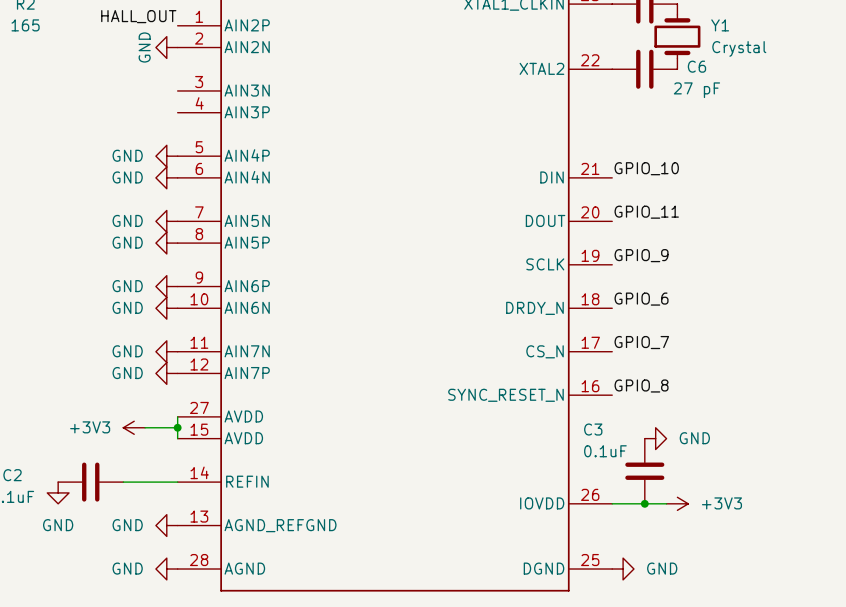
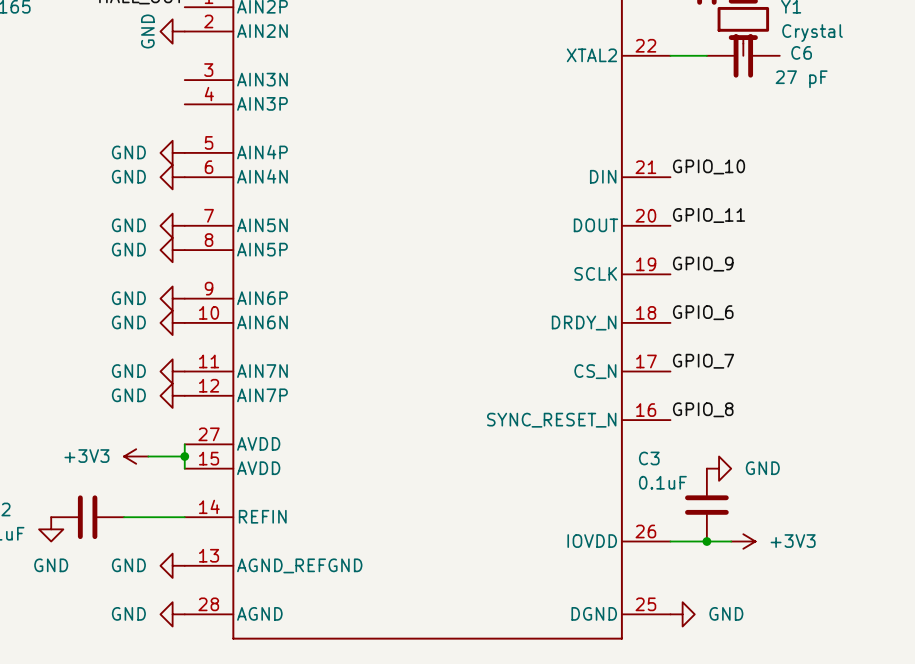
C6 position: (644, 69) -> (743, 55)

